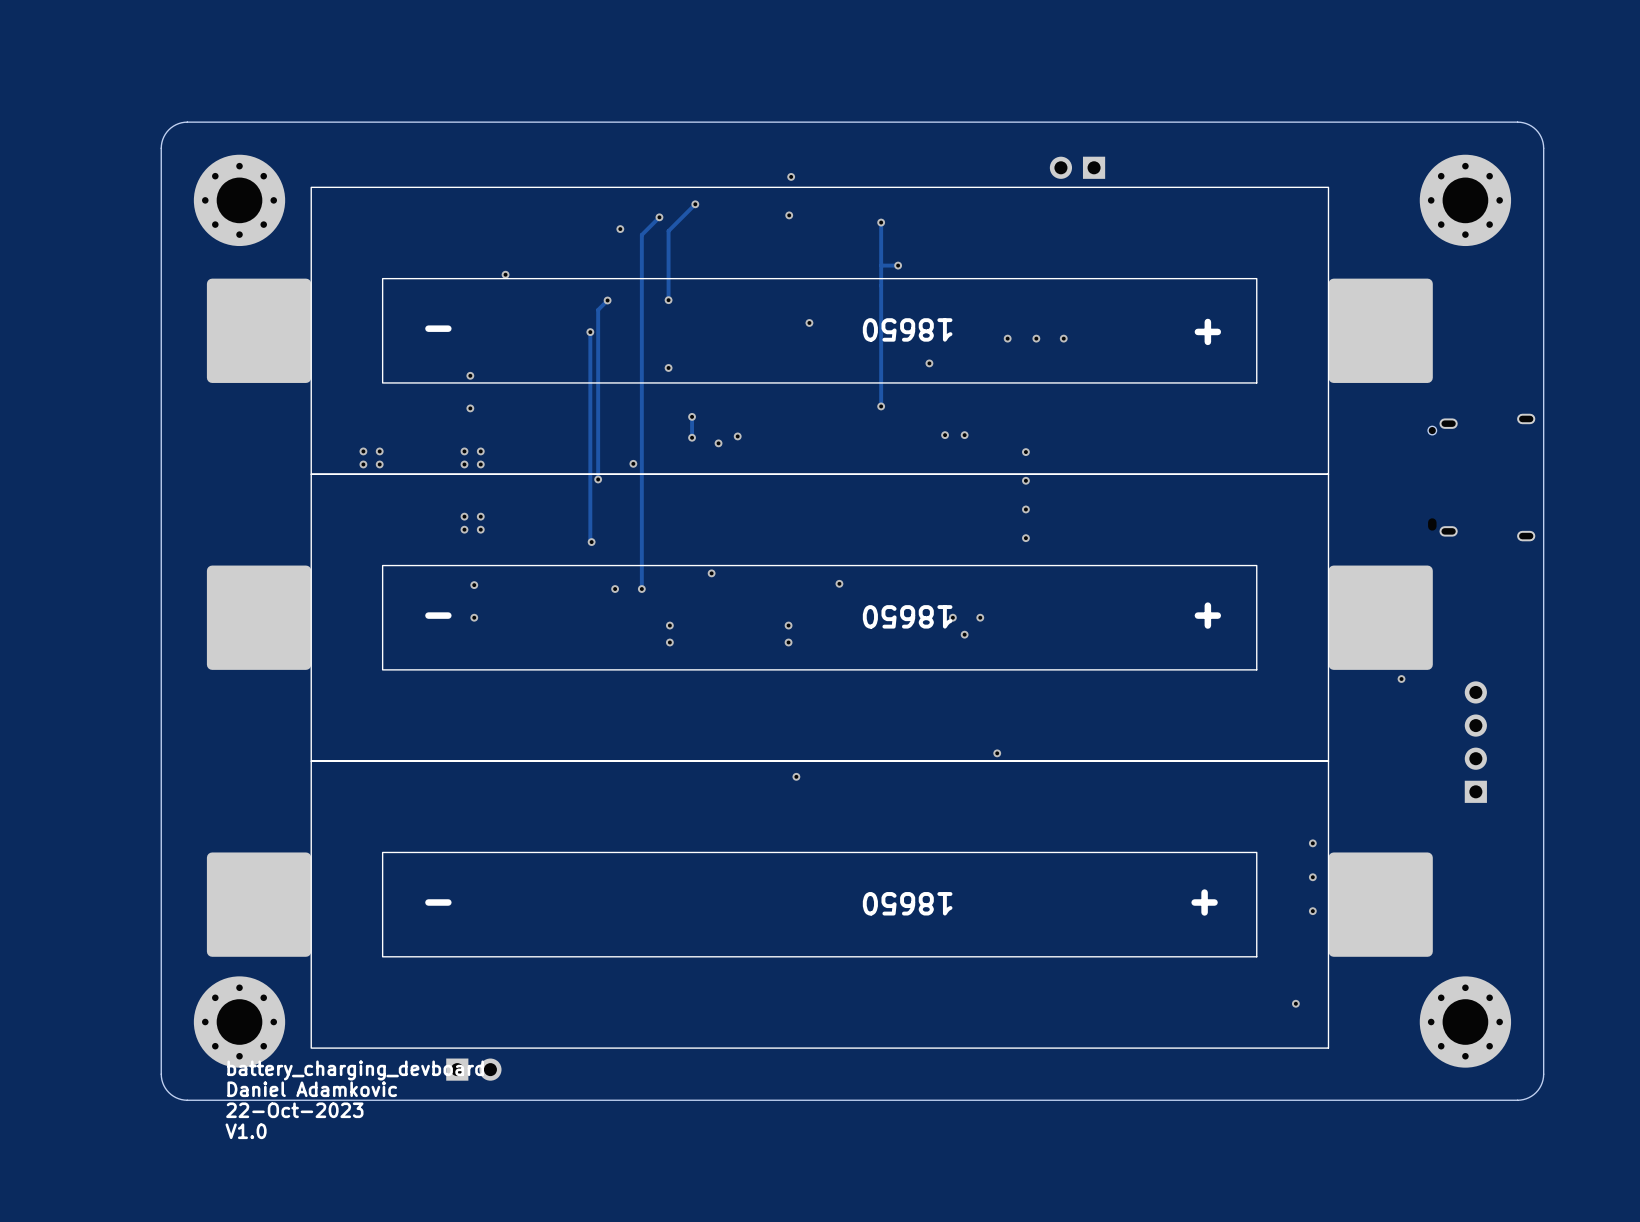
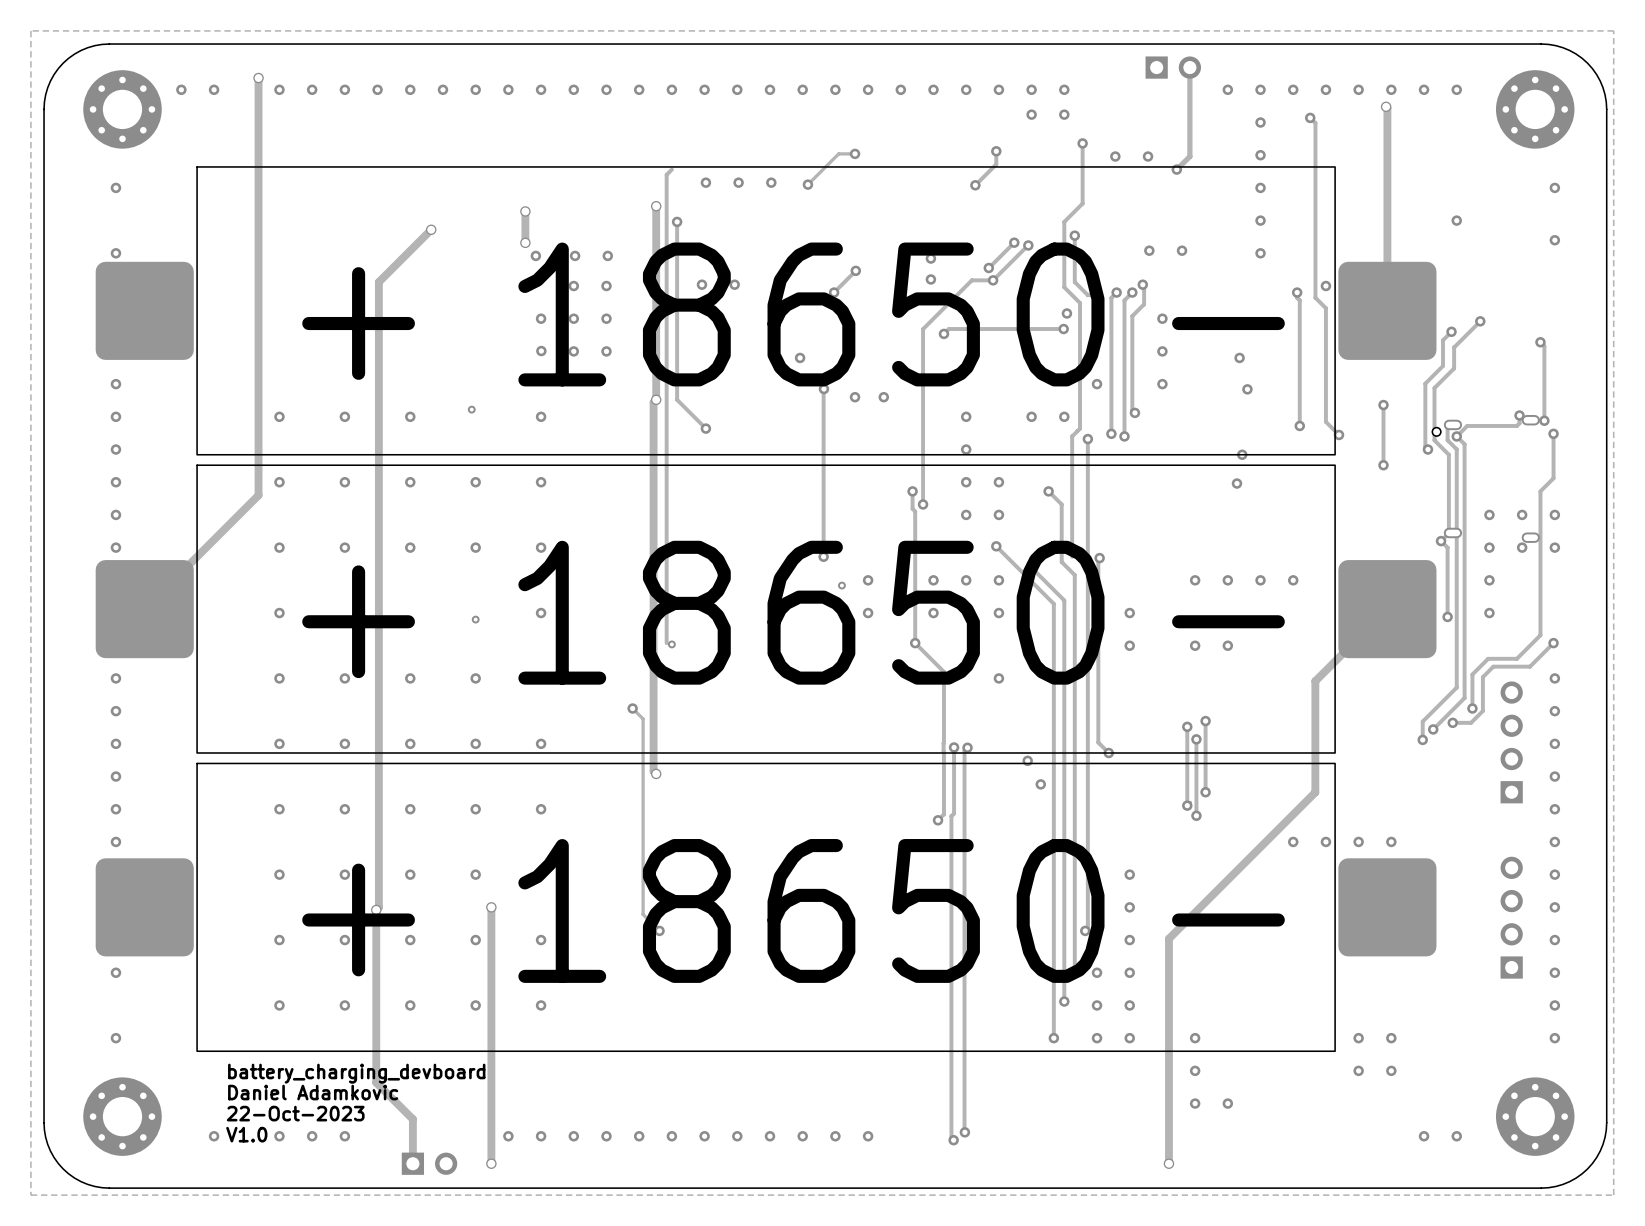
zone outline: none -> (1613, 30) (30, 30) (30, 1195) (1613, 1195) (1613, 30)
track: none -> (1189, 67) (1189, 156) (1176, 169)
track: none -> (258, 78) (258, 495) (144, 609)
via: none -> (258, 78)
via: none -> (181, 89)
via: none -> (214, 89)
via: none -> (279, 89)
via: none -> (312, 89)
via: none -> (344, 89)
via: none -> (377, 89)
via: none -> (410, 89)
via: none -> (442, 89)
via: none -> (475, 89)
via: none -> (508, 89)
via: none -> (541, 89)
via: none -> (573, 89)
via: none -> (606, 89)
via: none -> (639, 89)
via: none -> (671, 89)
via: none -> (704, 89)
via: none -> (737, 89)
via: none -> (770, 89)
via: none -> (802, 89)
via: none -> (835, 89)
via: none -> (868, 89)
via: none -> (900, 89)
via: none -> (933, 89)
via: none -> (966, 89)
via: none -> (998, 89)
via: none -> (1031, 89)
via: none -> (1064, 89)
via: none -> (1227, 89)
via: none -> (1260, 89)
via: none -> (1293, 89)
via: none -> (1325, 89)
via: none -> (1358, 89)
via: none -> (1391, 89)
via: none -> (1424, 89)
via: none -> (1456, 89)
track: none -> (1386, 106) (1387, 310)
via: none -> (1386, 106)
part: none -> (122, 109)
part: none -> (1535, 109)
via: none -> (1031, 114)
via: none -> (1064, 114)
track: none -> (1310, 117) (1315, 123) (1315, 297) (1325, 308) (1325, 421) (1339, 434)
via: none -> (1310, 117)
via: none -> (1260, 122)
board edge: (1517, 122) (187, 122) (171, 127) (163, 136) (161, 148) (161, 1074) (166, 1090) (176, 1097) (187, 1100) (1517, 1100) (1533, 1094) (1541, 1085) (1543, 1074) (1543, 148) (1541, 136) (1536, 129) (1528, 124) (1517, 122) -> (1541, 44) (1562, 47) (1576, 54) (1587, 63) (1600, 81) (1605, 94) (1606, 109) (1606, 1122) (1605, 1137) (1600, 1151) (1592, 1163) (1582, 1173) (1562, 1184) (1541, 1188) (109, 1188) (94, 1186) (81, 1181) (68, 1173) (58, 1163) (47, 1144) (44, 1122) (44, 109) (45, 94) (50, 81) (58, 68) (68, 58) (87, 47) (109, 44) (1541, 44)
track: none -> (1082, 143) (1082, 203) (1064, 221) (1064, 287) (1080, 303) (1080, 428) (1072, 436) (1072, 556)
via: none -> (1082, 143)
track: none -> (996, 151) (996, 164) (975, 185)
via: none -> (996, 151)
track: none -> (855, 153) (838, 153) (807, 184)
via: none -> (855, 153)
via: none -> (1260, 155)
via: none -> (1115, 156)
via: none -> (1148, 156)
part rotation: 0° (1077, 167) -> 180° (1173, 67)
part position: (1077, 167) -> (1173, 67)
track: none -> (671, 169) (666, 174) (666, 643)
via: none -> (1176, 169)
via: (791, 176) -> none
via: none -> (705, 182)
via: none -> (738, 182)
via: none -> (771, 182)
via: none -> (807, 184)
via: none -> (975, 185)
via: none -> (115, 187)
via: none -> (1260, 187)
via: none -> (1554, 187)
part: (239, 200) -> none
part: (1465, 200) -> none
track: (695, 204) (668, 231) (668, 300) -> none
via: (695, 204) -> none
track: none -> (656, 206) (656, 399) (653, 402) (653, 771) (656, 773)
via: none -> (656, 206)
track: none -> (525, 211) (525, 242)
via: none -> (525, 211)
via: (789, 215) -> none
track: (659, 217) (641, 234) (641, 589) -> none
via: (659, 217) -> none
via: none -> (1260, 220)
via: none -> (1456, 220)
track: none -> (677, 221) (677, 399) (705, 428)
via: none -> (677, 221)
track: (881, 222) (881, 406) -> none
via: (881, 222) -> none
track: none -> (431, 229) (378, 282) (378, 907) (376, 909) (376, 1082) (412, 1119) (412, 1163)
via: none -> (431, 229)
via: (620, 229) -> none
track: none -> (1074, 235) (1074, 282) (1087, 295) (1100, 295)
via: none -> (1074, 235)
via: none -> (1554, 240)
track: none -> (1014, 242) (988, 268)
via: none -> (1014, 242)
via: none -> (525, 242)
track: none -> (1028, 245) (993, 280) (971, 280) (923, 329) (923, 504)
via: none -> (1028, 245)
via: none -> (1149, 250)
via: none -> (1182, 250)
via: none -> (115, 253)
via: none -> (1260, 253)
via: none -> (535, 255)
via: none -> (575, 255)
via: none -> (607, 255)
via: none -> (930, 258)
track: (898, 265) (881, 265) -> none
via: none -> (988, 268)
track: none -> (855, 270) (834, 292)
via: none -> (855, 270)
via: (505, 274) -> none
via: none -> (930, 279)
via: none -> (993, 280)
via: none -> (701, 284)
via: none -> (734, 284)
track: none -> (1142, 284) (1144, 304) (1132, 316) (1132, 410) (1134, 412)
via: none -> (1142, 284)
via: none -> (573, 286)
via: none -> (606, 286)
via: none -> (1325, 286)
via: none -> (834, 292)
track: none -> (1116, 292) (1111, 297) (1111, 433)
via: none -> (1116, 292)
track: none -> (1132, 292) (1124, 300) (1124, 436)
via: none -> (1132, 292)
track: none -> (1297, 292) (1297, 297) (1299, 300) (1299, 425)
via: none -> (1297, 292)
track: (607, 300) (598, 309) (598, 479) -> none
via: (607, 300) -> none
via: (668, 300) -> none
part: none -> (766, 310)
via: none -> (1066, 313)
via: none -> (541, 318)
via: none -> (573, 318)
via: none -> (606, 318)
via: none -> (1162, 318)
track: none -> (1480, 321) (1454, 347) (1454, 368) (1434, 388) (1434, 440) (1448, 454) (1448, 533) (1441, 541) (1447, 547) (1447, 616)
via: none -> (1480, 321)
via: (809, 322) -> none
track: none -> (1063, 329) (948, 329) (943, 333)
via: none -> (1063, 329)
part: (819, 330) -> none
track: none -> (1451, 331) (1443, 340) (1443, 365) (1425, 383) (1425, 446) (1427, 449)
via: none -> (1451, 331)
track: (590, 332) (591, 542) -> none
via: (590, 332) -> none
via: none -> (943, 333)
via: (1007, 338) -> none
via: (1036, 338) -> none
via: (1063, 338) -> none
track: none -> (1540, 342) (1544, 346) (1544, 420)
via: none -> (1540, 342)
via: none -> (541, 351)
via: none -> (573, 351)
via: none -> (606, 351)
via: none -> (1162, 351)
via: none -> (800, 357)
via: none -> (1239, 357)
via: (929, 363) -> none
via: (668, 367) -> none
via: (470, 375) -> none
via: none -> (115, 384)
via: none -> (1097, 384)
via: none -> (1162, 384)
track: none -> (823, 389) (823, 556)
via: none -> (823, 389)
via: none -> (1247, 389)
via: none -> (855, 397)
via: none -> (883, 397)
via: none -> (656, 399)
track: none -> (1383, 405) (1383, 465)
via: none -> (1383, 405)
via: (881, 406) -> none
via: none -> (1134, 412)
track: none -> (1519, 415) (1519, 423) (1516, 425) (1467, 425) (1456, 436) (1464, 444) (1464, 698) (1433, 729)
via: none -> (1519, 415)
via: none -> (115, 416)
via: none -> (279, 416)
via: none -> (344, 416)
via: none -> (410, 416)
via: none -> (541, 416)
via: none -> (966, 416)
via: none -> (1031, 416)
via: none -> (1064, 416)
track: (692, 416) (692, 437) -> none
via: (692, 416) -> none
via: none -> (1544, 420)
track: none -> (1448, 423) (1447, 440) (1456, 449) (1456, 687) (1422, 721) (1422, 739)
via: none -> (1299, 425)
via: none -> (705, 428)
via: none -> (1111, 433)
track: none -> (1553, 433) (1553, 478) (1540, 491) (1540, 635) (1516, 658) (1488, 658) (1472, 674) (1472, 708)
via: none -> (1553, 433)
via: none -> (1339, 434)
via: (945, 435) -> none
via: (964, 435) -> none
via: none -> (1124, 436)
via: none -> (1456, 436)
via: (737, 436) -> none
via: (692, 437) -> none
track: none -> (1087, 439) (1087, 928) (1085, 930)
via: none -> (1087, 439)
via: (718, 443) -> none
via: none -> (115, 449)
via: none -> (966, 449)
via: none -> (1427, 449)
via: (363, 451) -> none
via: (379, 451) -> none
via: (464, 451) -> none
via: (480, 451) -> none
via: (1025, 452) -> none
via: none -> (1242, 454)
via: (633, 463) -> none
via: none -> (1383, 465)
via: (363, 464) -> none
via: (379, 464) -> none
via: (464, 464) -> none
via: (480, 464) -> none
via: (598, 479) -> none
via: none -> (115, 482)
via: none -> (279, 482)
via: none -> (344, 482)
via: none -> (410, 482)
via: none -> (475, 482)
via: none -> (541, 482)
via: none -> (966, 482)
via: none -> (998, 482)
via: (1025, 480) -> none
via: none -> (1236, 483)
track: none -> (912, 491) (912, 508) (915, 511) (915, 643) (943, 671) (943, 814) (938, 820)
via: none -> (912, 491)
track: none -> (1048, 491) (1061, 504) (1061, 562) (1074, 575) (1074, 967)
via: none -> (1048, 491)
via: none -> (923, 504)
via: (1025, 509) -> none
via: none -> (115, 514)
via: none -> (966, 514)
via: none -> (998, 514)
via: none -> (1489, 514)
via: none -> (1522, 514)
via: none -> (1554, 514)
via: (464, 516) -> none
via: (480, 516) -> none
via: (464, 529) -> none
via: (480, 529) -> none
via: (1025, 538) -> none
via: none -> (1441, 541)
via: (591, 542) -> none
track: none -> (996, 546) (1053, 603) (1053, 1038)
via: none -> (996, 546)
via: none -> (115, 547)
via: none -> (279, 547)
via: none -> (344, 547)
via: none -> (410, 547)
via: none -> (475, 547)
via: none -> (541, 547)
via: none -> (1489, 547)
via: none -> (1522, 547)
via: none -> (1554, 547)
via: none -> (823, 556)
track: none -> (1099, 558) (1098, 742) (1108, 752)
via: none -> (1099, 558)
track: none -> (1028, 564) (1064, 600) (1064, 1001)
via: (711, 573) -> none
via: none -> (868, 580)
via: none -> (933, 580)
via: none -> (966, 580)
via: none -> (998, 580)
via: none -> (1195, 580)
via: none -> (1227, 580)
via: none -> (1260, 580)
via: none -> (1293, 580)
via: none -> (1489, 580)
via: (474, 585) -> none
via: (615, 589) -> none
via: (641, 589) -> none
part: none -> (766, 609)
track: none -> (1387, 609) (1315, 681) (1315, 792) (1168, 938) (1168, 1163)
via: none -> (279, 613)
via: none -> (541, 613)
via: none -> (868, 613)
via: none -> (933, 613)
via: none -> (998, 613)
via: none -> (1129, 613)
via: none -> (1489, 613)
via: none -> (1447, 616)
part: (819, 617) -> none
via: (952, 617) -> none
via: (980, 617) -> none
via: (669, 625) -> none
via: (788, 625) -> none
via: (964, 634) -> none
via: none -> (915, 643)
track: none -> (1553, 643) (1529, 666) (1493, 666) (1482, 677) (1482, 711) (1471, 722) (1452, 722)
via: none -> (1553, 643)
via: (788, 642) -> none
via: none -> (1129, 645)
via: none -> (1195, 645)
via: none -> (1227, 645)
via: none -> (115, 678)
via: none -> (279, 678)
via: none -> (344, 678)
via: none -> (410, 678)
via: none -> (475, 678)
via: none -> (998, 678)
via: none -> (1554, 678)
via: (1401, 679) -> none
track: none -> (632, 708) (643, 718) (643, 914) (659, 930)
via: none -> (632, 708)
via: none -> (1472, 708)
via: none -> (115, 711)
via: none -> (1554, 711)
track: none -> (1205, 721) (1205, 792)
via: none -> (1205, 721)
via: none -> (1452, 722)
track: none -> (1187, 726) (1187, 805) (1190, 802)
via: none -> (1187, 726)
via: none -> (1433, 729)
track: none -> (1196, 739) (1196, 815)
via: none -> (1196, 739)
via: none -> (1422, 739)
via: none -> (115, 743)
via: none -> (279, 743)
via: none -> (344, 743)
via: none -> (410, 743)
via: none -> (475, 743)
via: none -> (541, 743)
via: none -> (1554, 743)
part position: (1475, 742) -> (1511, 742)
track: none -> (954, 747) (954, 813) (951, 816) (951, 1137) (953, 1140)
via: none -> (954, 747)
track: none -> (967, 747) (964, 750) (964, 1132)
via: none -> (967, 747)
via: none -> (1108, 752)
via: (997, 753) -> none
via: none -> (1027, 760)
via: none -> (656, 773)
via: none -> (115, 776)
via: none -> (1554, 776)
via: (796, 776) -> none
via: none -> (1040, 784)
via: none -> (1205, 792)
via: none -> (1187, 805)
via: none -> (115, 809)
via: none -> (279, 809)
via: none -> (344, 809)
via: none -> (410, 809)
via: none -> (475, 809)
via: none -> (541, 809)
via: none -> (1554, 809)
via: none -> (1196, 815)
via: none -> (938, 820)
via: none -> (115, 841)
via: none -> (1293, 841)
via: none -> (1325, 841)
via: none -> (1358, 841)
via: none -> (1391, 841)
via: none -> (1554, 841)
via: (1312, 843) -> none
via: none -> (279, 874)
via: none -> (344, 874)
via: none -> (410, 874)
via: none -> (475, 874)
via: none -> (1129, 874)
via: none -> (1554, 874)
via: (1312, 877) -> none
track: none -> (491, 907) (491, 1163)
via: none -> (491, 907)
part: none -> (766, 907)
part: (819, 904) -> none
via: none -> (1129, 907)
via: none -> (1554, 907)
via: none -> (376, 909)
via: (1312, 911) -> none
part: none -> (1511, 917)
via: none -> (659, 930)
via: none -> (1085, 930)
via: none -> (279, 940)
via: none -> (344, 940)
via: none -> (410, 940)
via: none -> (475, 940)
via: none -> (541, 940)
via: none -> (1129, 940)
via: none -> (1554, 940)
via: none -> (115, 972)
via: none -> (1097, 972)
via: none -> (1129, 972)
via: none -> (1554, 972)
via: none -> (1064, 1001)
via: none -> (279, 1005)
via: none -> (344, 1005)
via: none -> (410, 1005)
via: none -> (475, 1005)
via: none -> (541, 1005)
via: none -> (1097, 1005)
via: none -> (1129, 1005)
via: none -> (1554, 1005)
via: (1295, 1003) -> none
part: (239, 1022) -> none
part: (1465, 1022) -> none
via: none -> (115, 1038)
via: none -> (1053, 1038)
via: none -> (1097, 1038)
via: none -> (1129, 1038)
via: none -> (1195, 1038)
via: none -> (1358, 1038)
via: none -> (1391, 1038)
via: none -> (1554, 1038)
via: none -> (1195, 1070)
via: none -> (1358, 1070)
via: none -> (1391, 1070)
part position: (473, 1069) -> (429, 1163)
via: none -> (1195, 1103)
via: none -> (1227, 1103)
part: none -> (122, 1116)
part: none -> (1535, 1116)
via: none -> (964, 1132)
via: none -> (214, 1136)
via: none -> (279, 1136)
via: none -> (312, 1136)
via: none -> (344, 1136)
via: none -> (508, 1136)
via: none -> (541, 1136)
via: none -> (573, 1136)
via: none -> (606, 1136)
via: none -> (639, 1136)
via: none -> (671, 1136)
via: none -> (704, 1136)
via: none -> (737, 1136)
via: none -> (770, 1136)
via: none -> (802, 1136)
via: none -> (835, 1136)
via: none -> (868, 1136)
via: none -> (1424, 1136)
via: none -> (1456, 1136)
via: none -> (953, 1140)
via: none -> (491, 1163)
via: none -> (1168, 1163)

